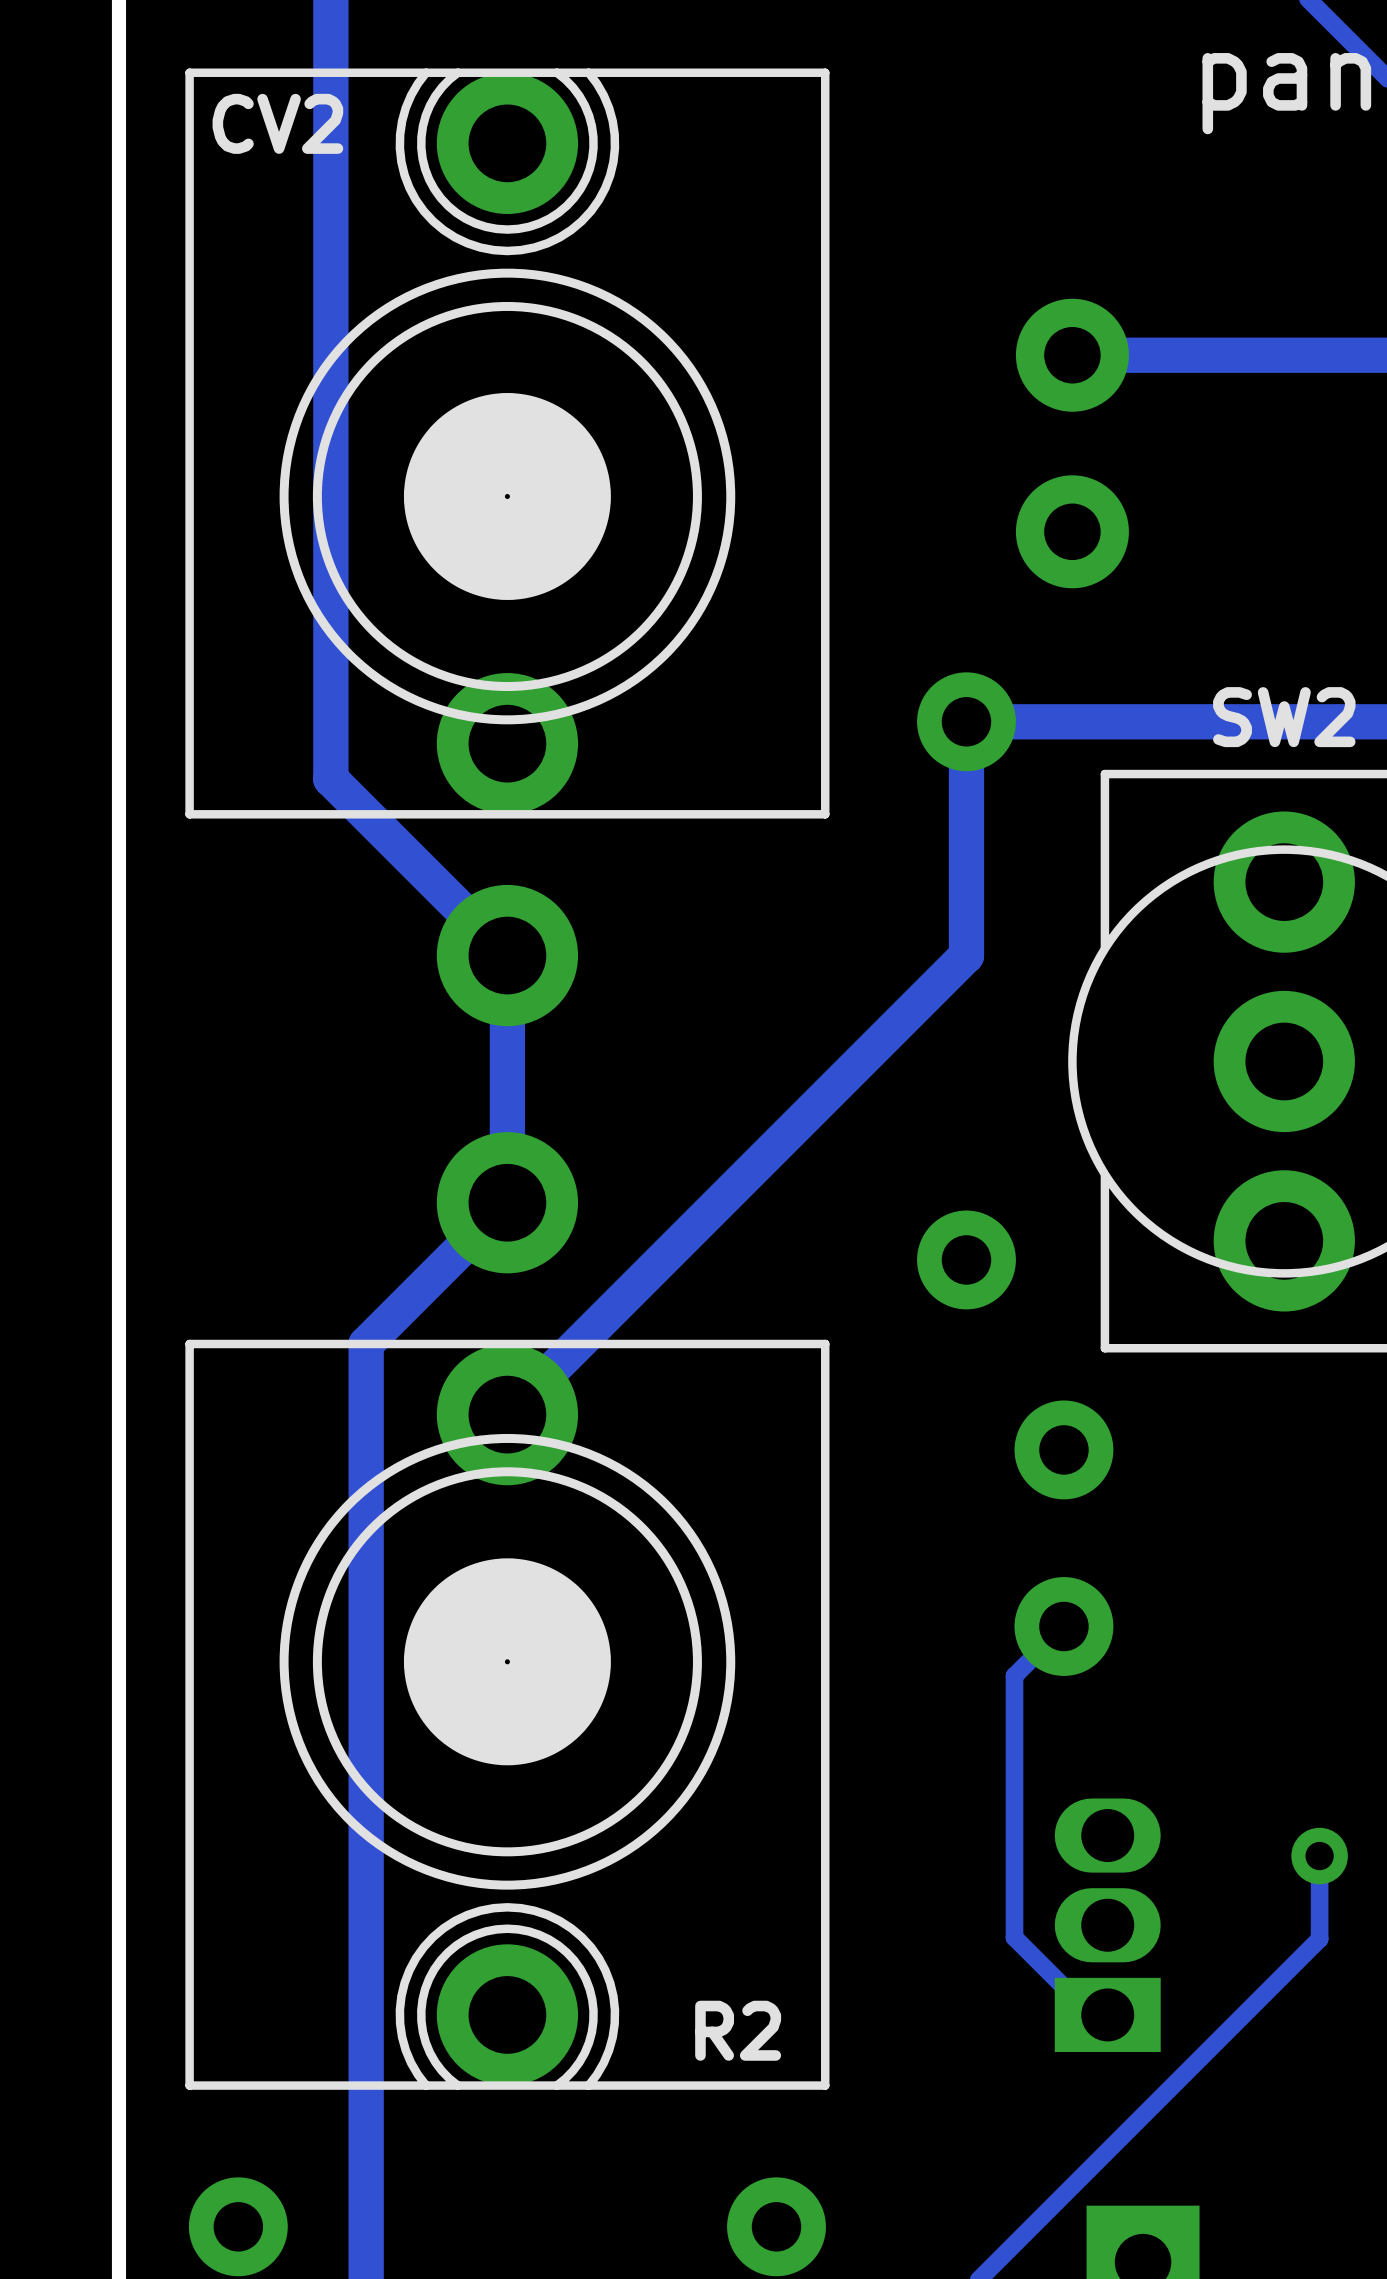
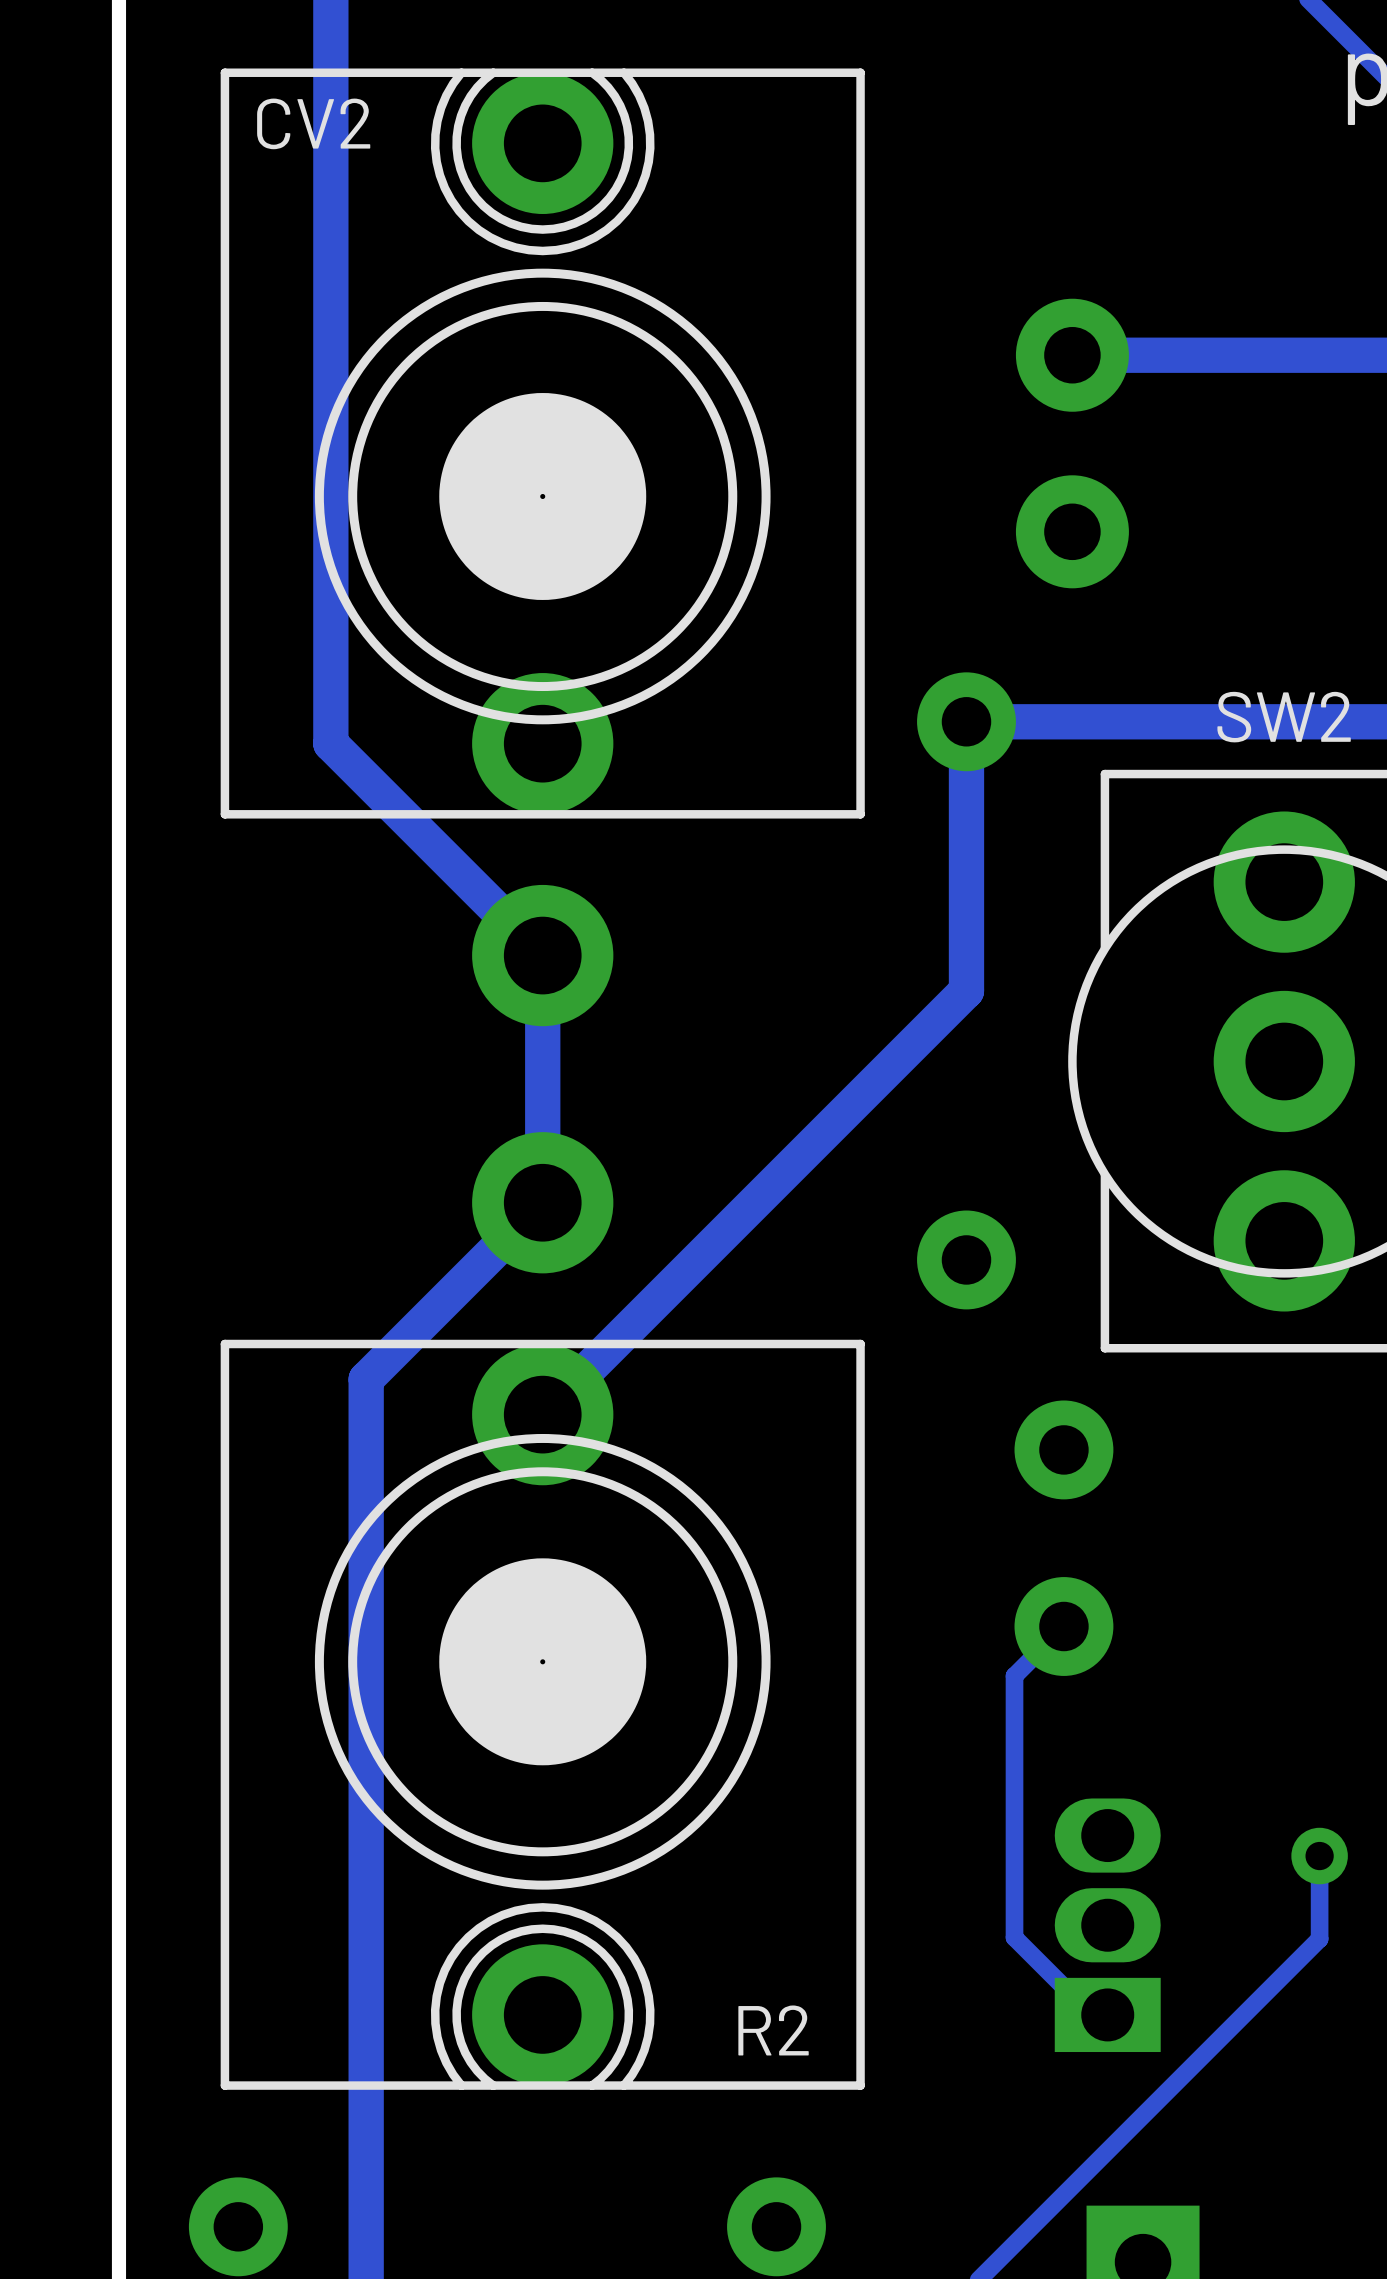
part position: (507, 547) -> (542, 547)
track: (330, 743) (330, 778) (507, 955) (507, 1202) (366, 1344) (366, 1379) -> (330, 743) (542, 955) (542, 1202) (366, 1379)
track: (966, 955) (507, 1414) -> (966, 955) (966, 990) (542, 1414)
part position: (507, 1610) -> (542, 1610)

